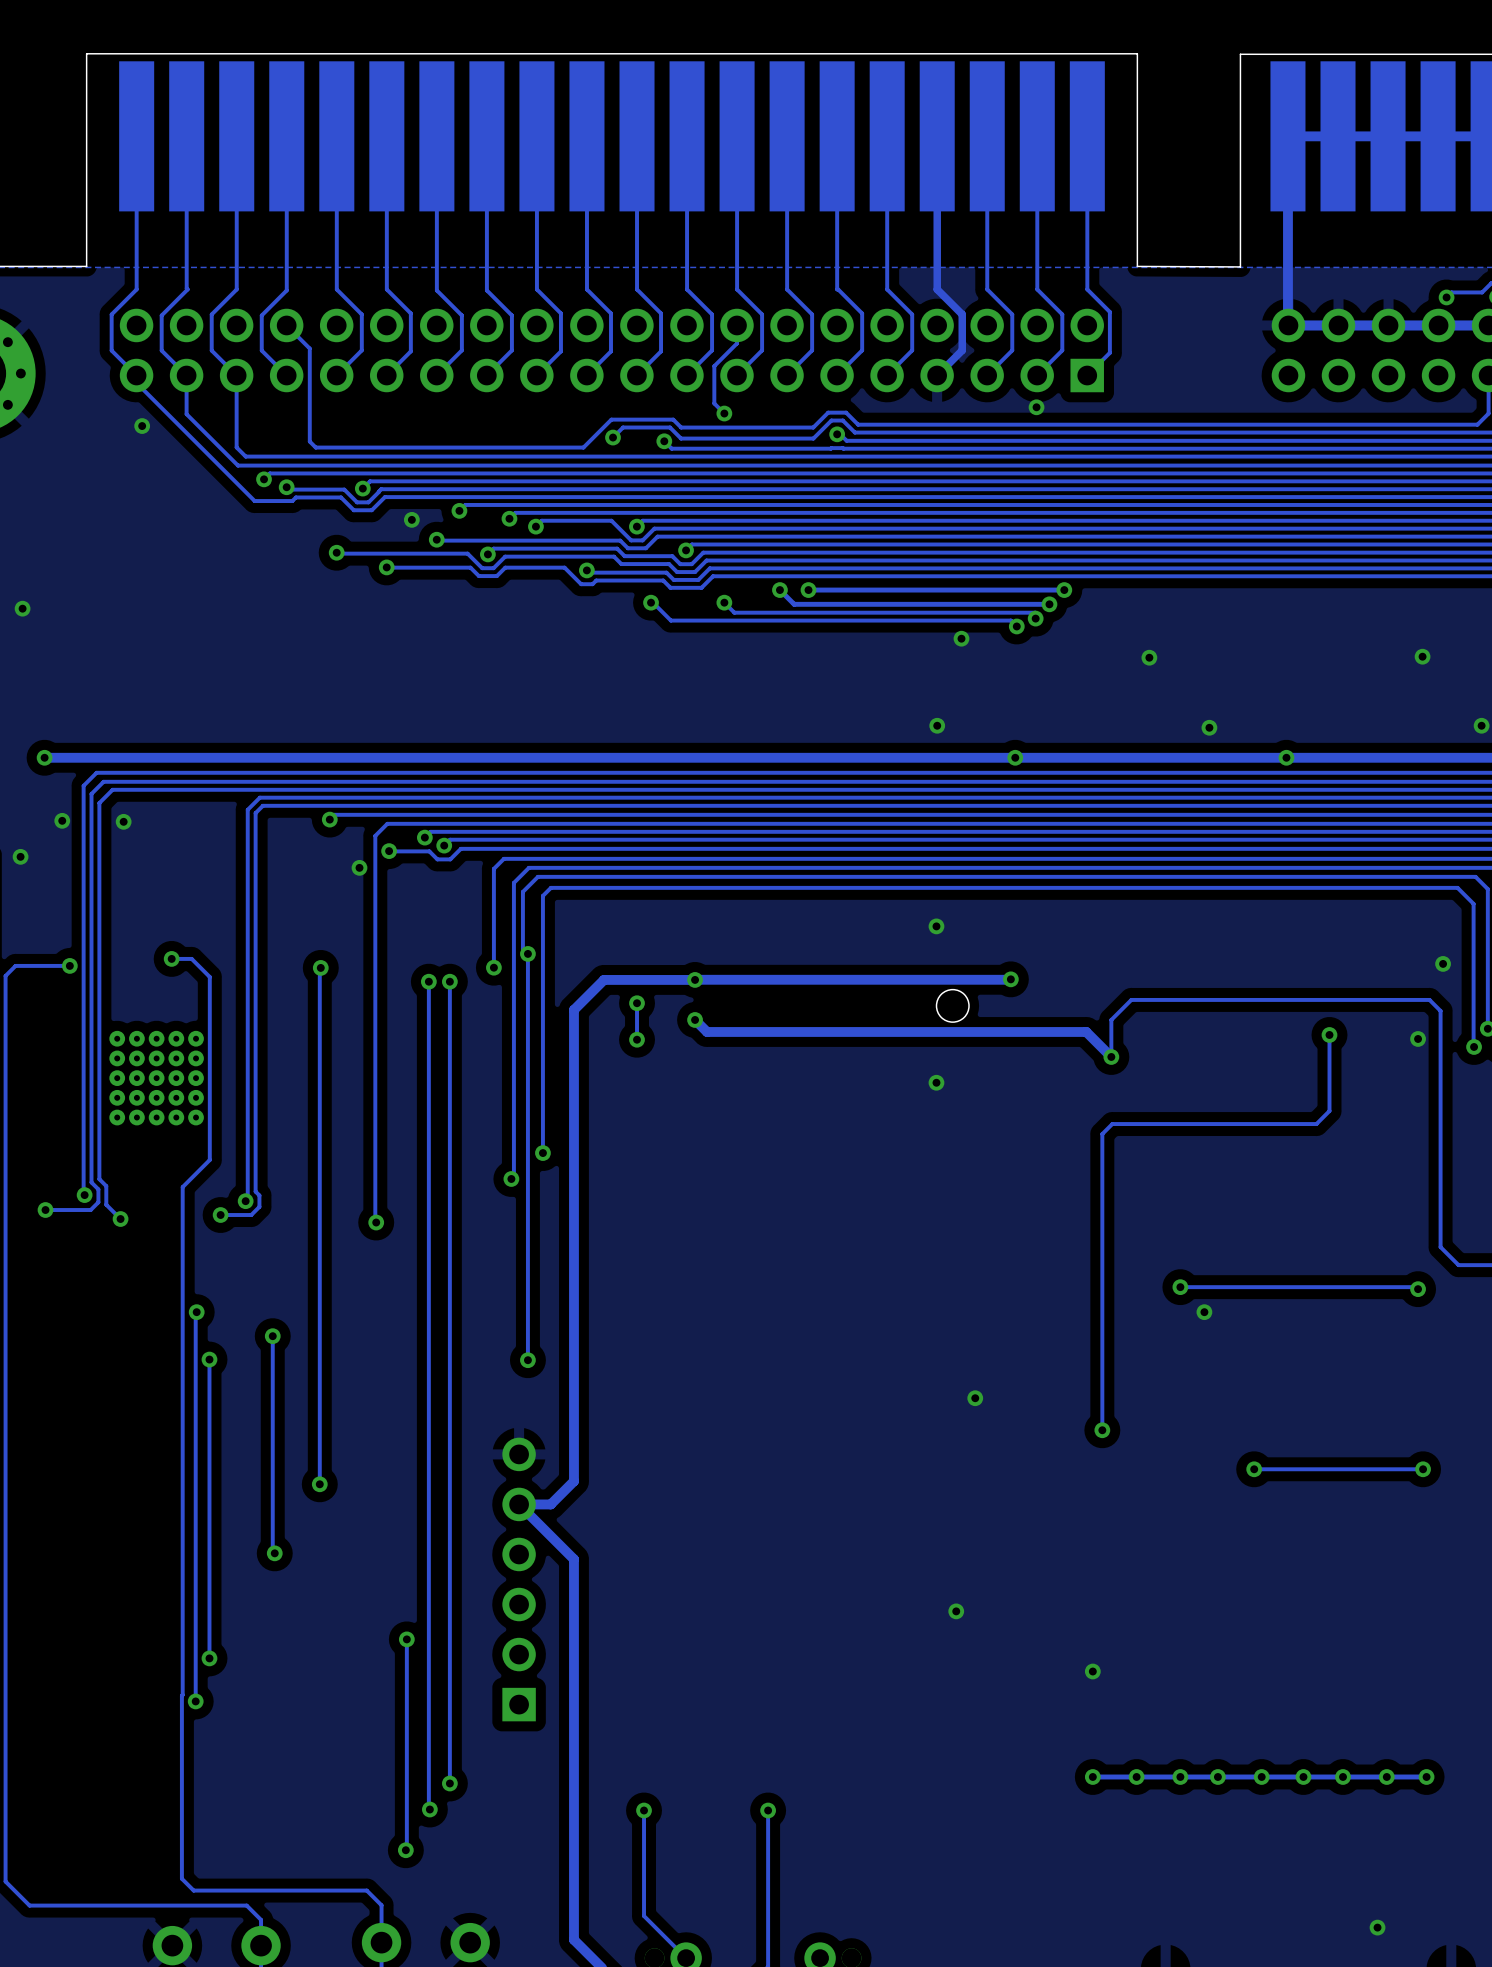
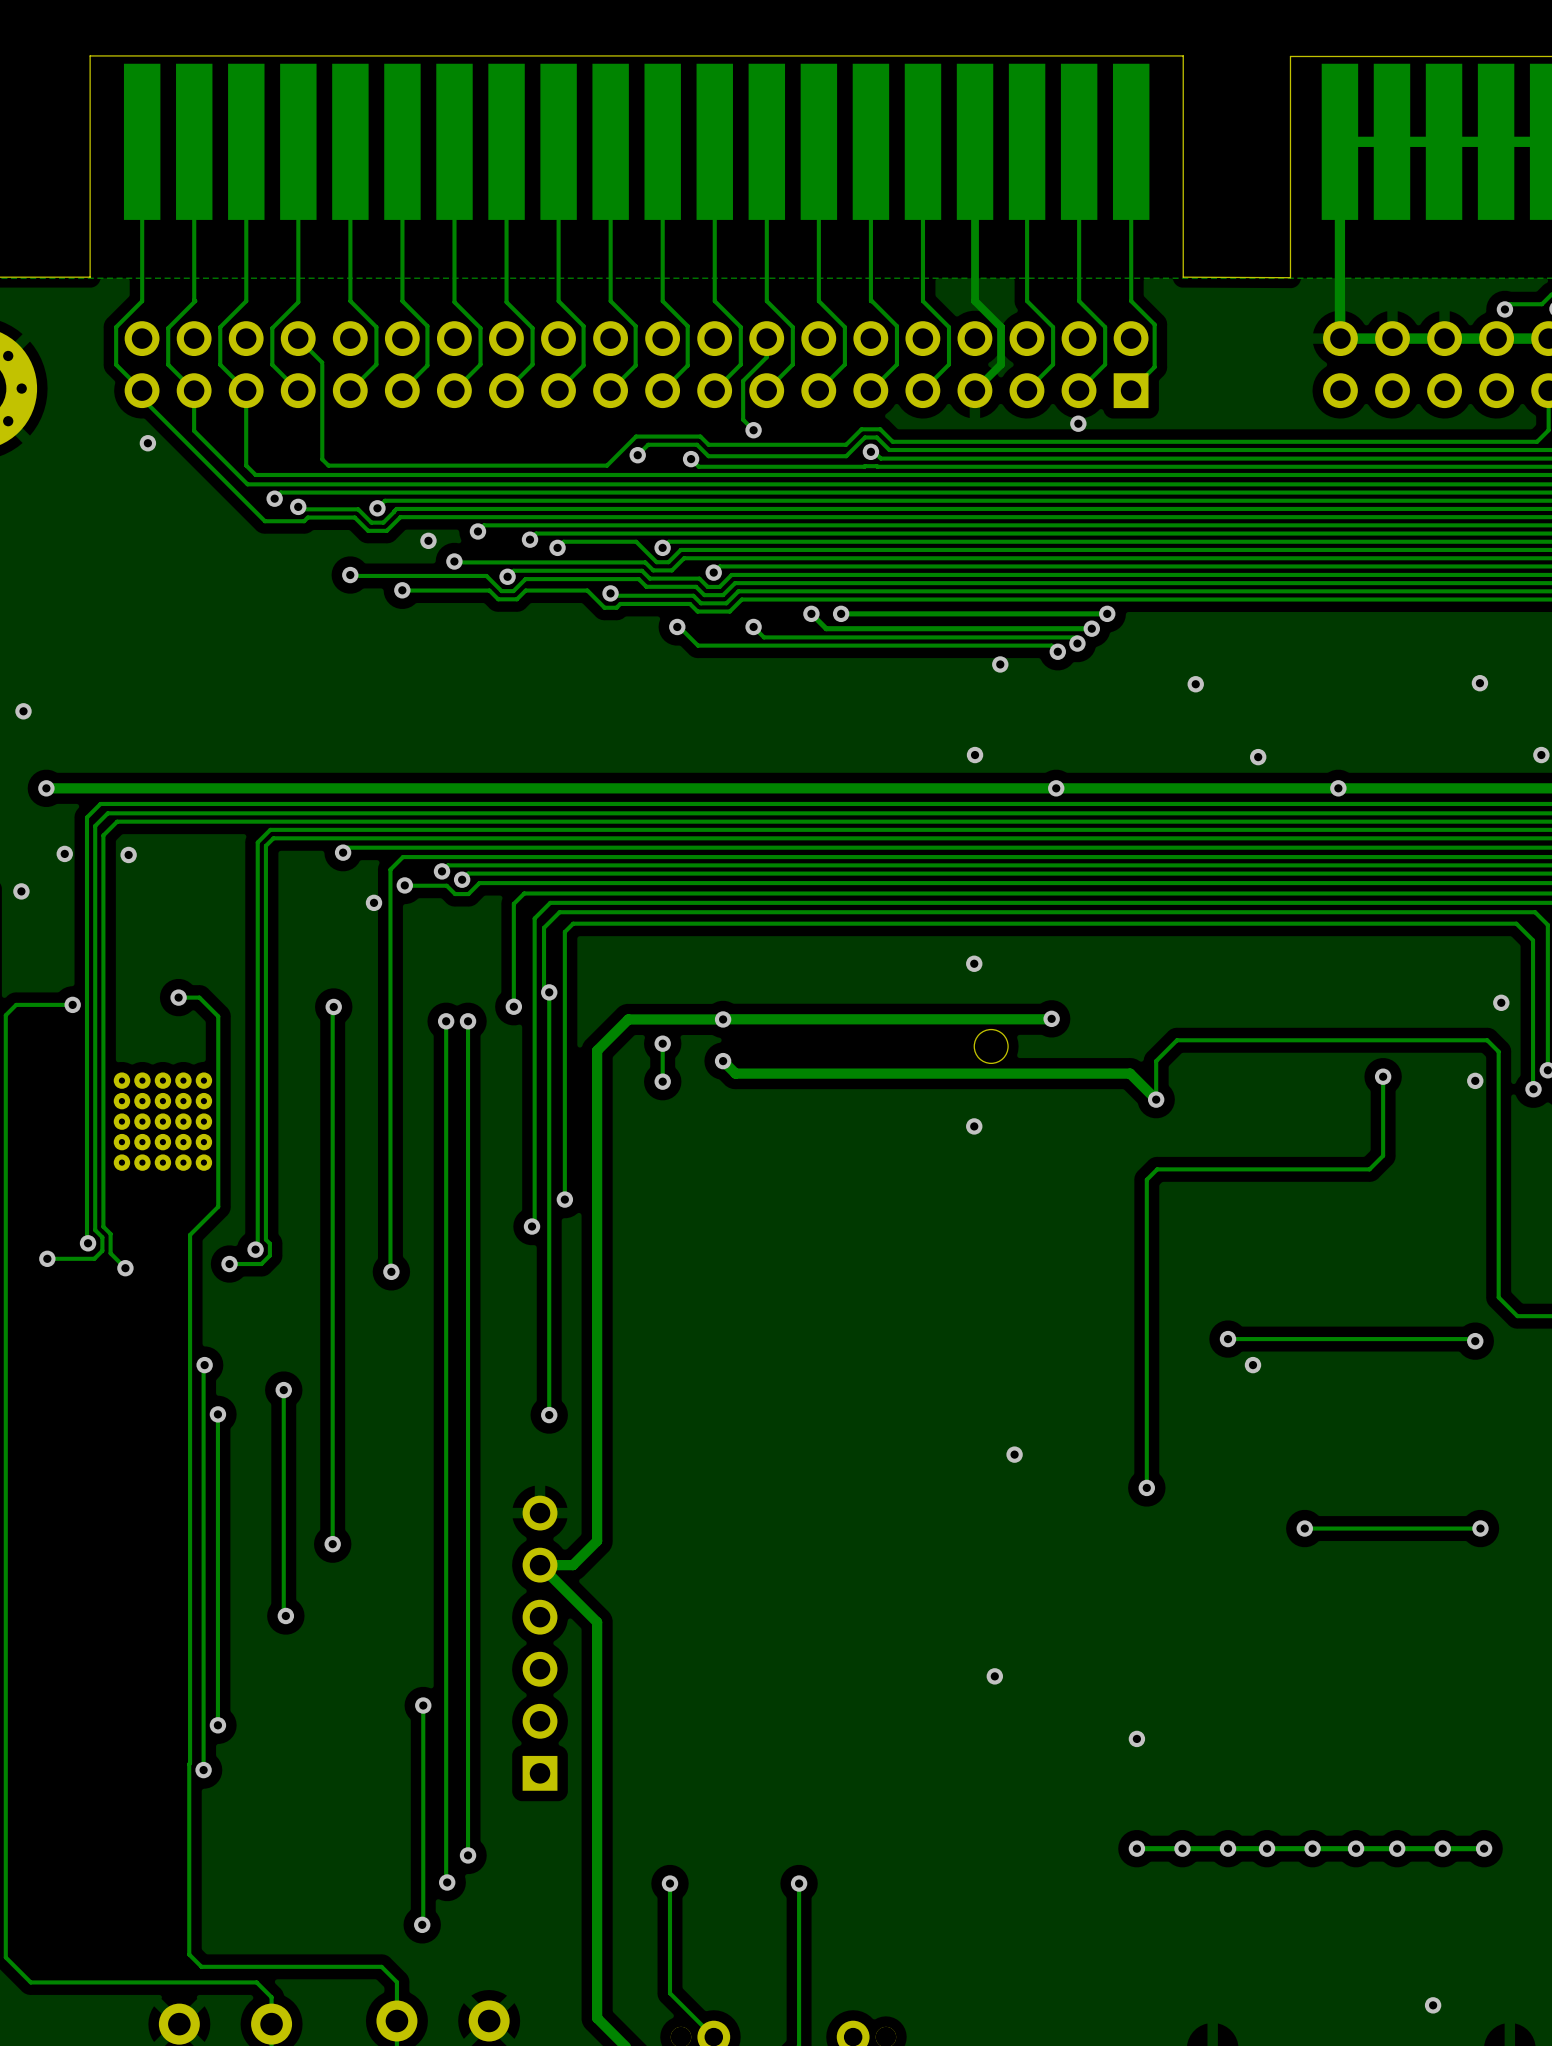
via position: (22, 608) -> (23, 711)

